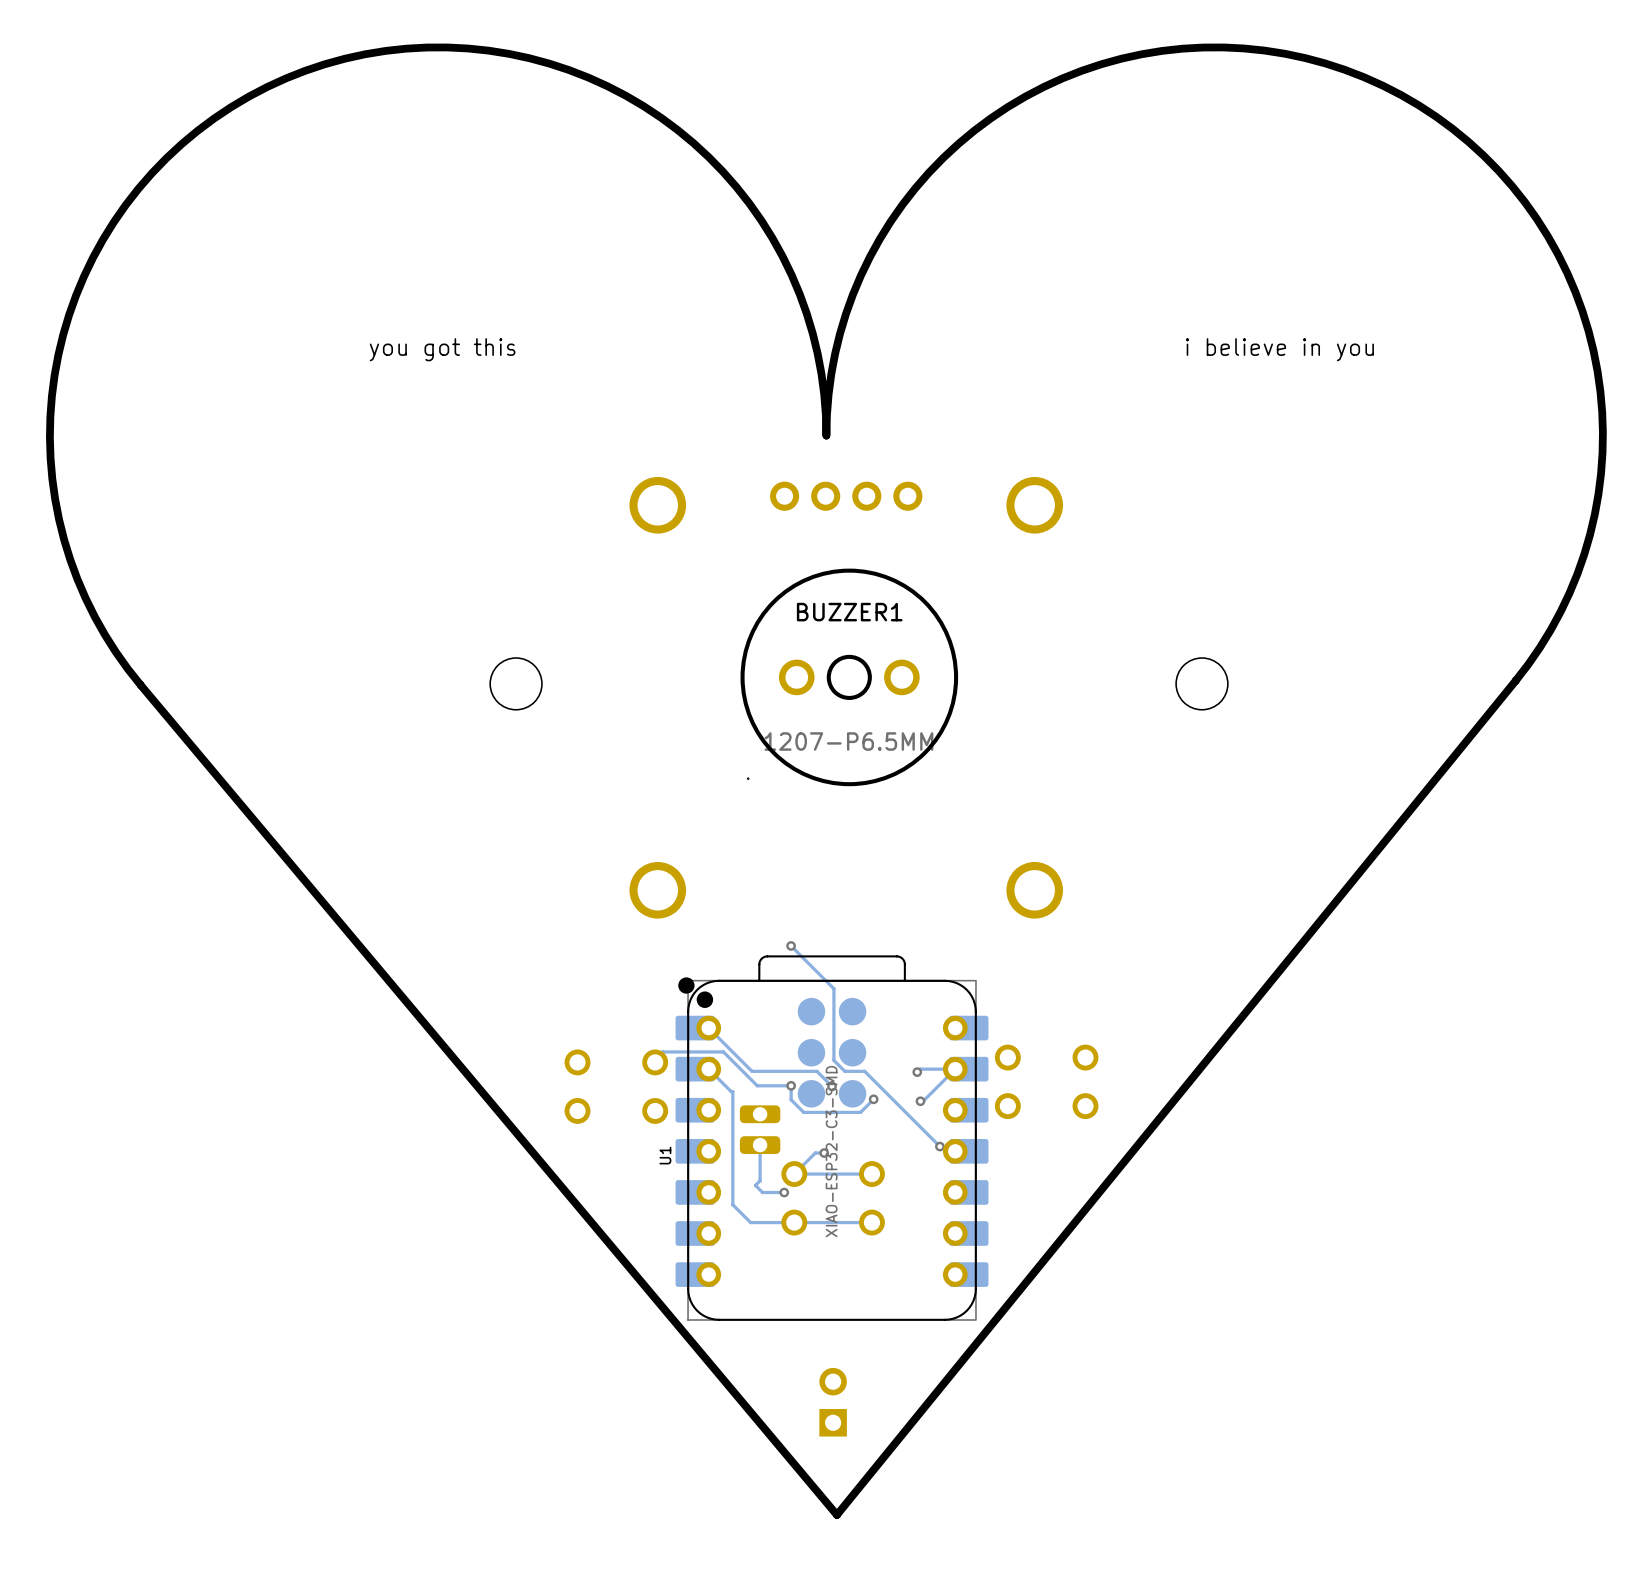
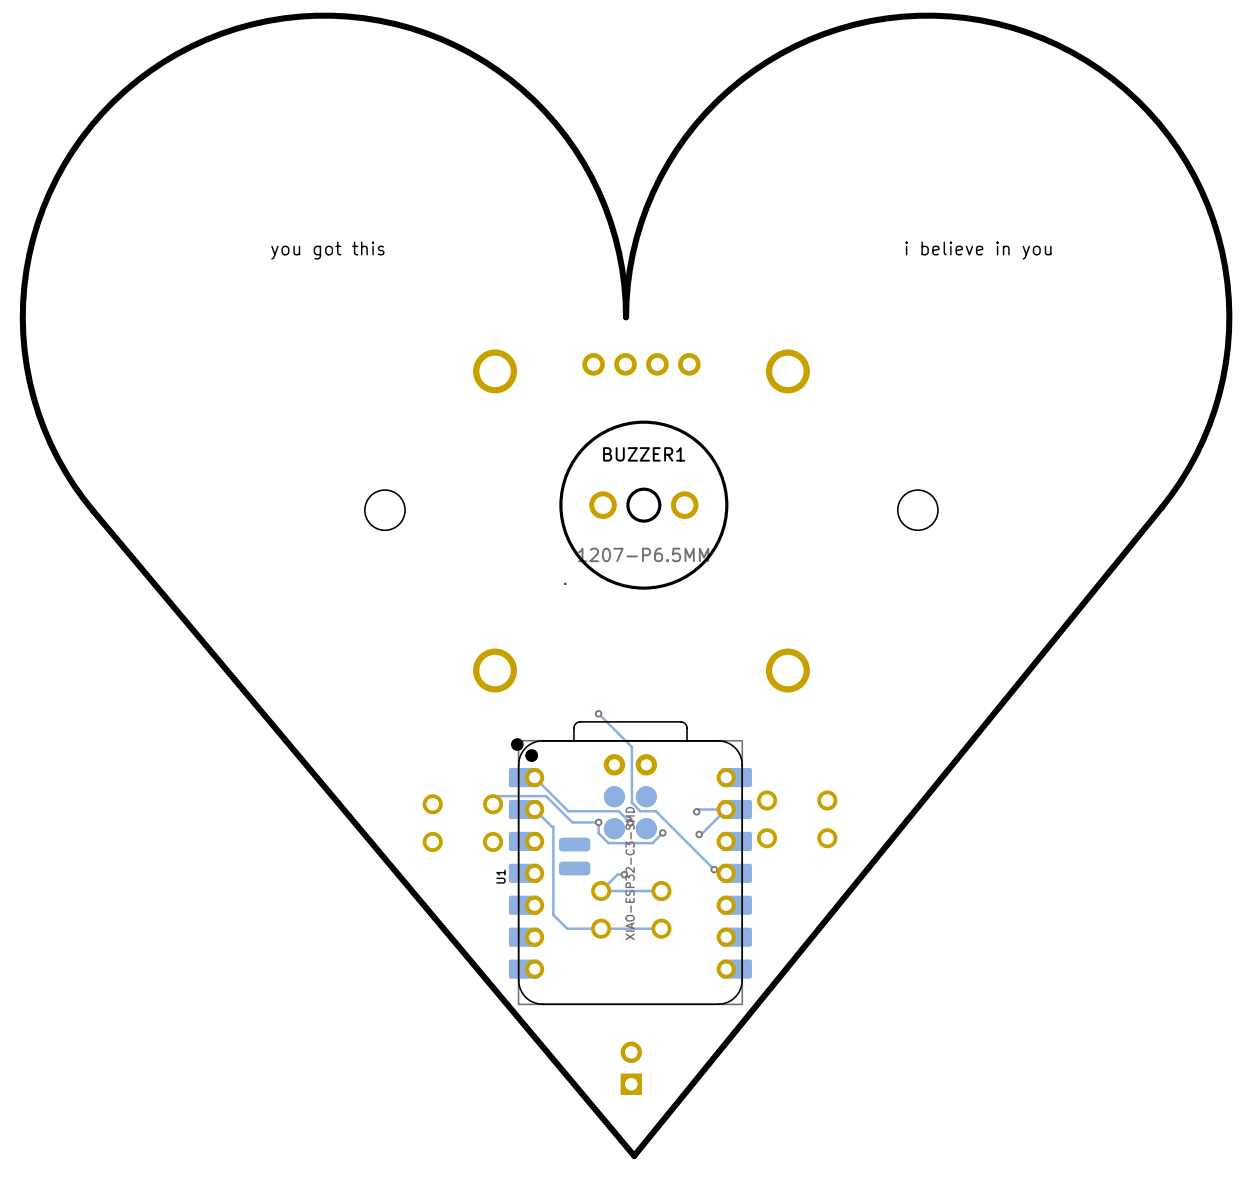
U1 footprint: [675, 955, 989, 1321] -> [508, 721, 752, 1006]
track: (760, 1145) (760, 1180) (755, 1185) (762, 1192) (784, 1192) -> none
via: (784, 1192) -> none

